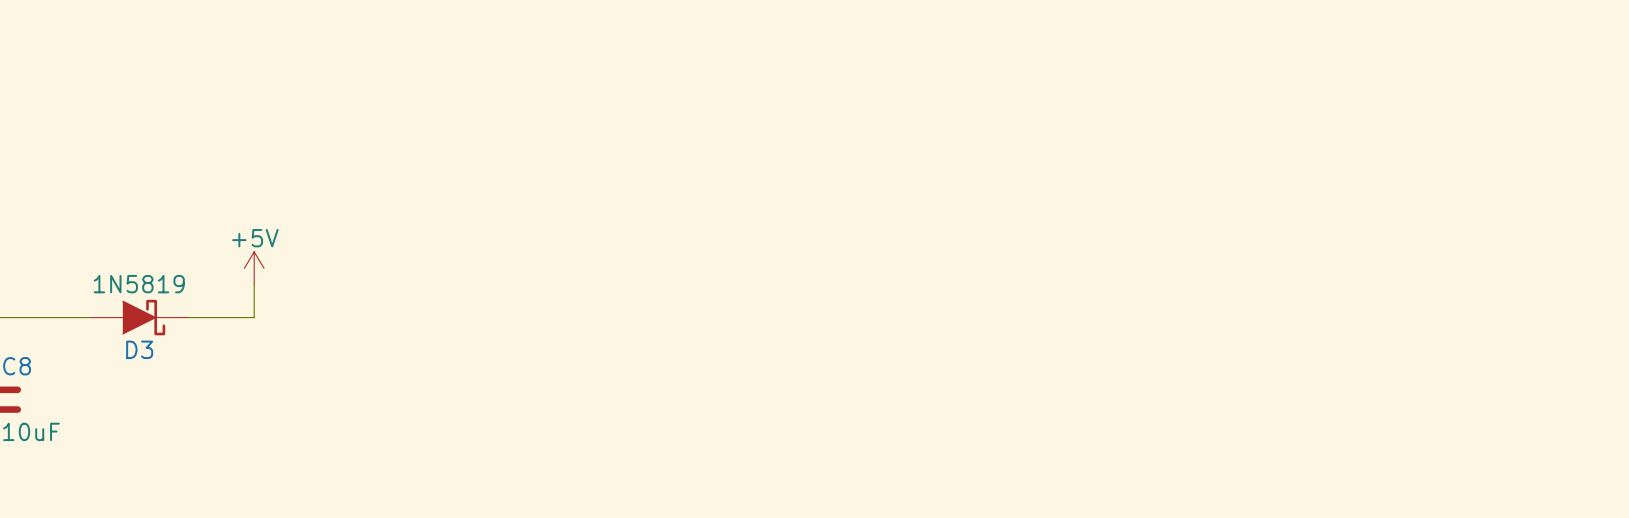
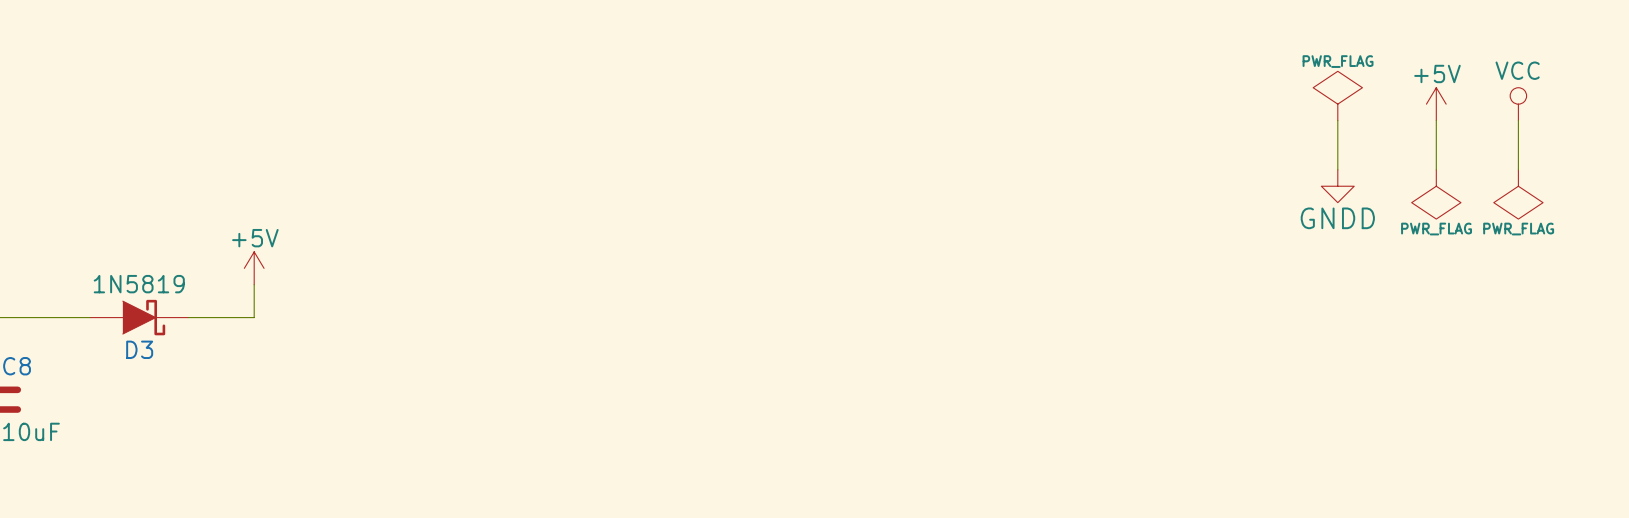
power symbol: none -> PWR_FLAG (1337, 95)
power symbol: none -> +5V (1436, 104)
power symbol: none -> VCC (1518, 104)
wire: none -> (1337, 120) (1337, 169)
wire: none -> (1436, 120) (1436, 169)
wire: none -> (1518, 120) (1518, 169)
power symbol: none -> GNDD (1337, 186)
power symbol: none -> PWR_FLAG (1436, 194)
power symbol: none -> PWR_FLAG (1518, 194)

